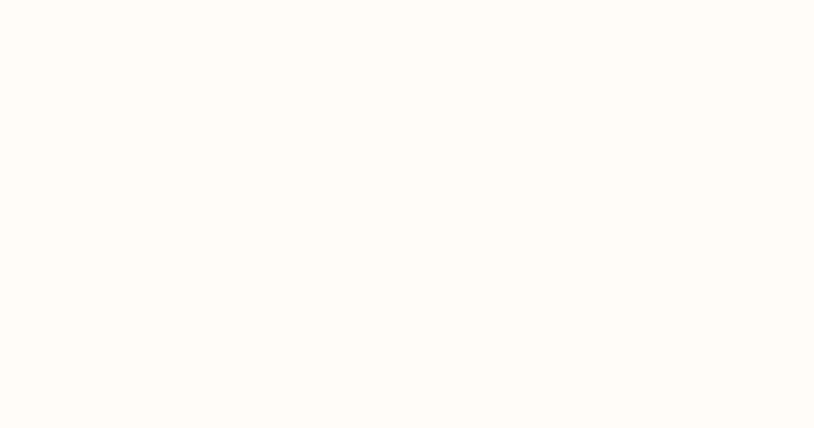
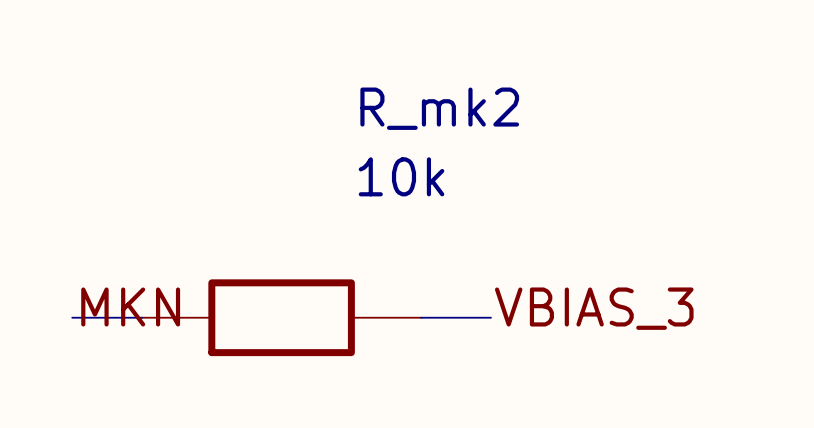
label: none -> MKN (130, 307)
label: none -> VBIAS_3 (594, 308)
wire: none -> (72, 317) (142, 317)
R_mk2: none -> 10k (281, 317)
wire: none -> (421, 317) (490, 317)

